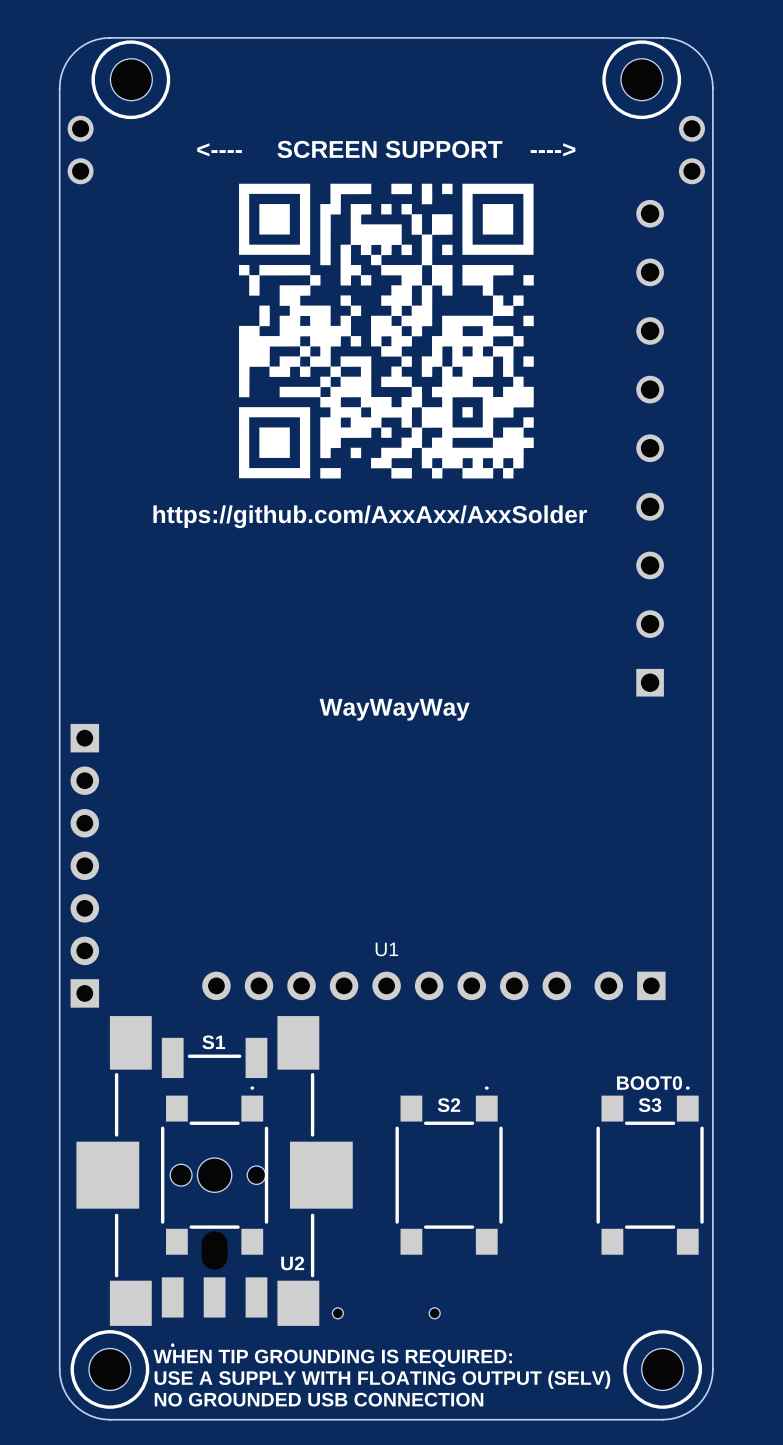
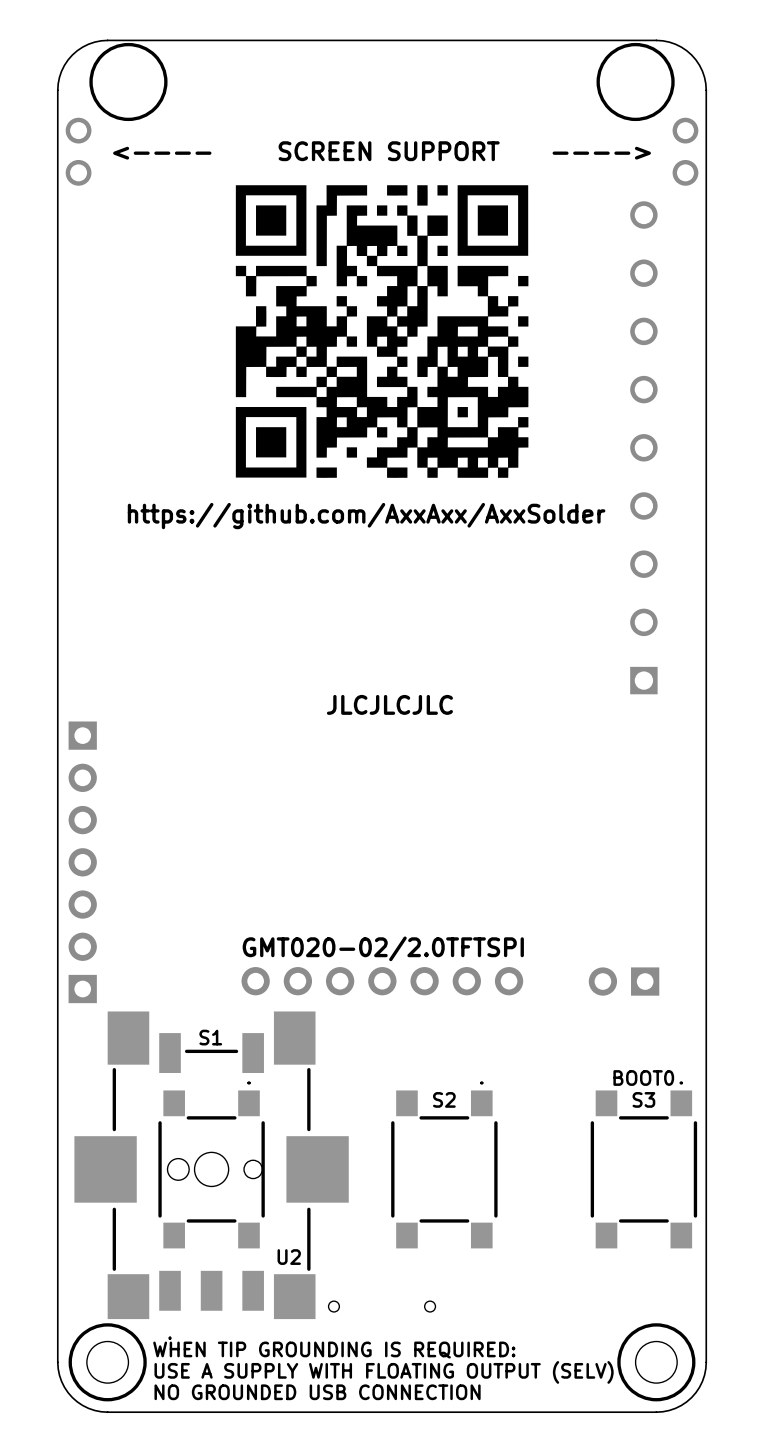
U1: (386, 529) -> none
text: WayWayWay (394, 709) -> JLCJLCJLC (389, 704)
text: none -> GMT020-02/2.0TFTSPI (383, 948)
part: none -> (382, 981)

